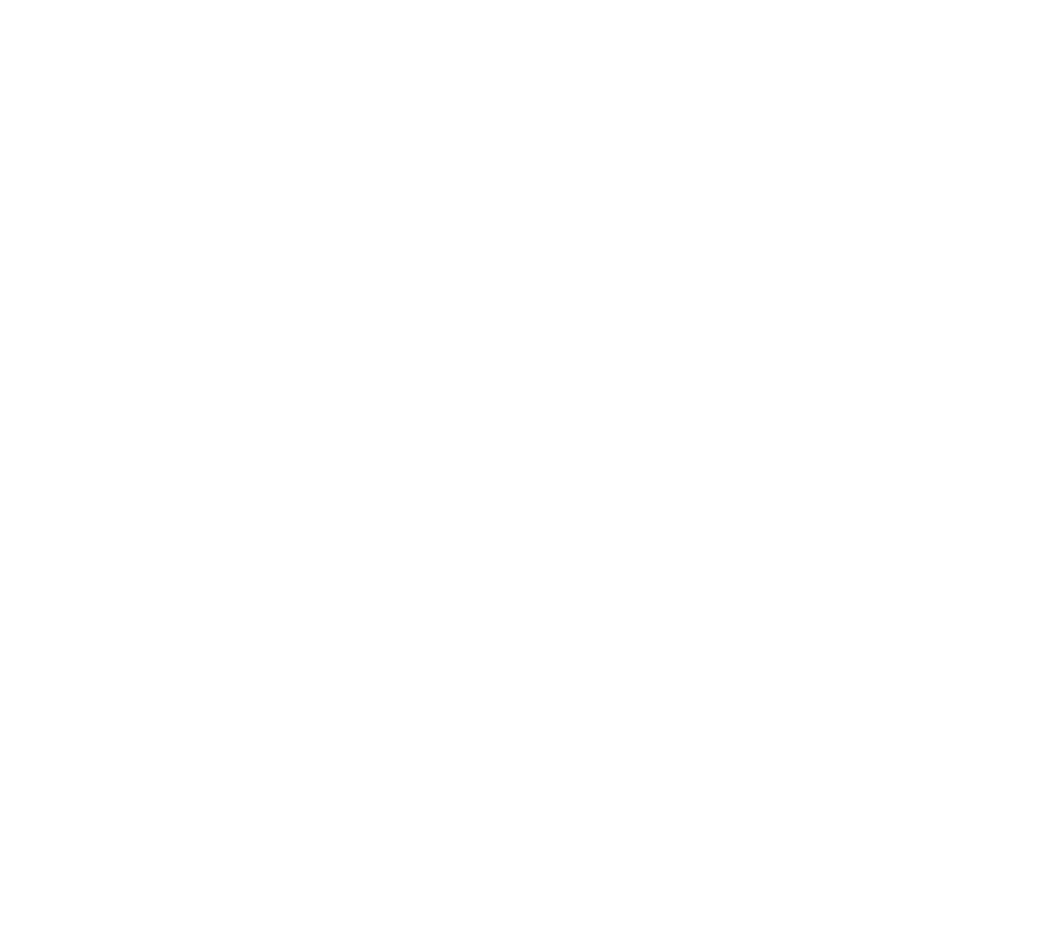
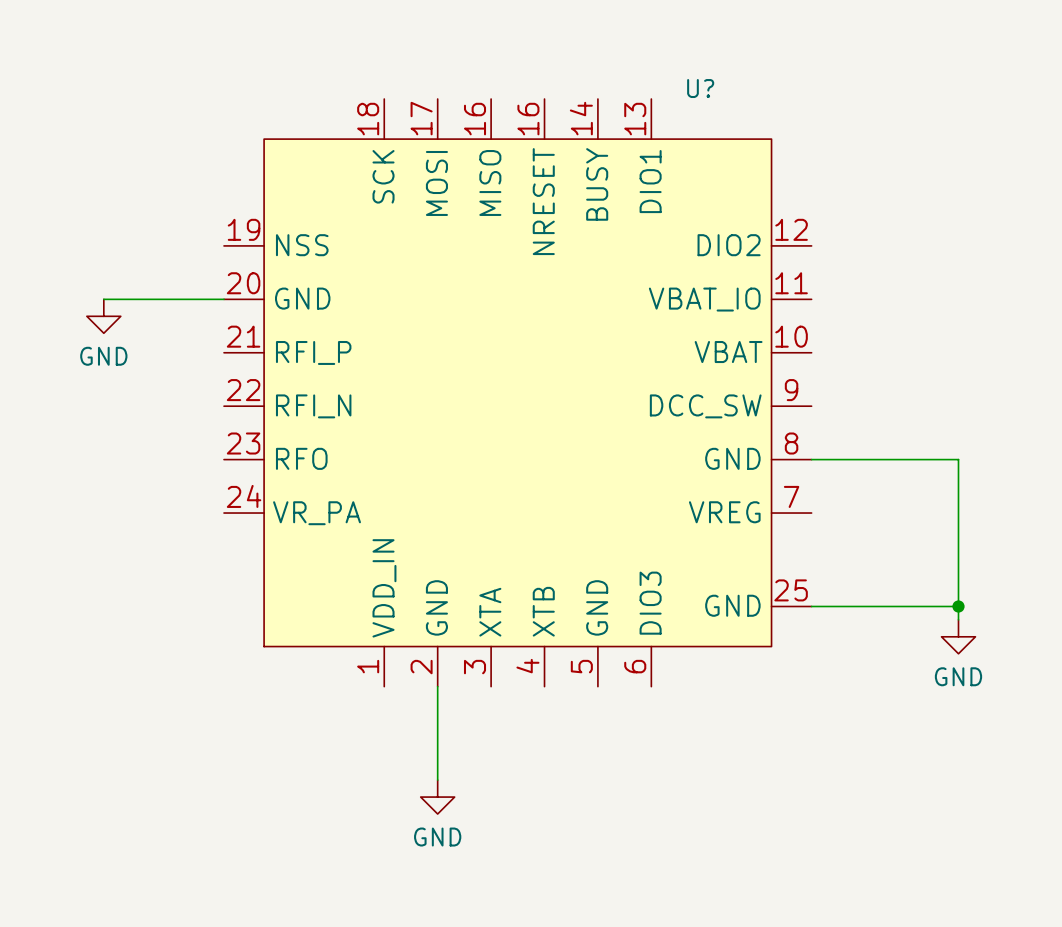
wire: none -> (103, 299) (224, 299)
power symbol: none -> GND (103, 316)
U?: none -> (517, 392)
wire: none -> (811, 459) (958, 459) (958, 619)
wire: none -> (811, 606) (958, 606)
junction: none -> (958, 606)
power symbol: none -> GND (958, 636)
wire: none -> (437, 686) (437, 780)
power symbol: none -> GND (437, 797)

